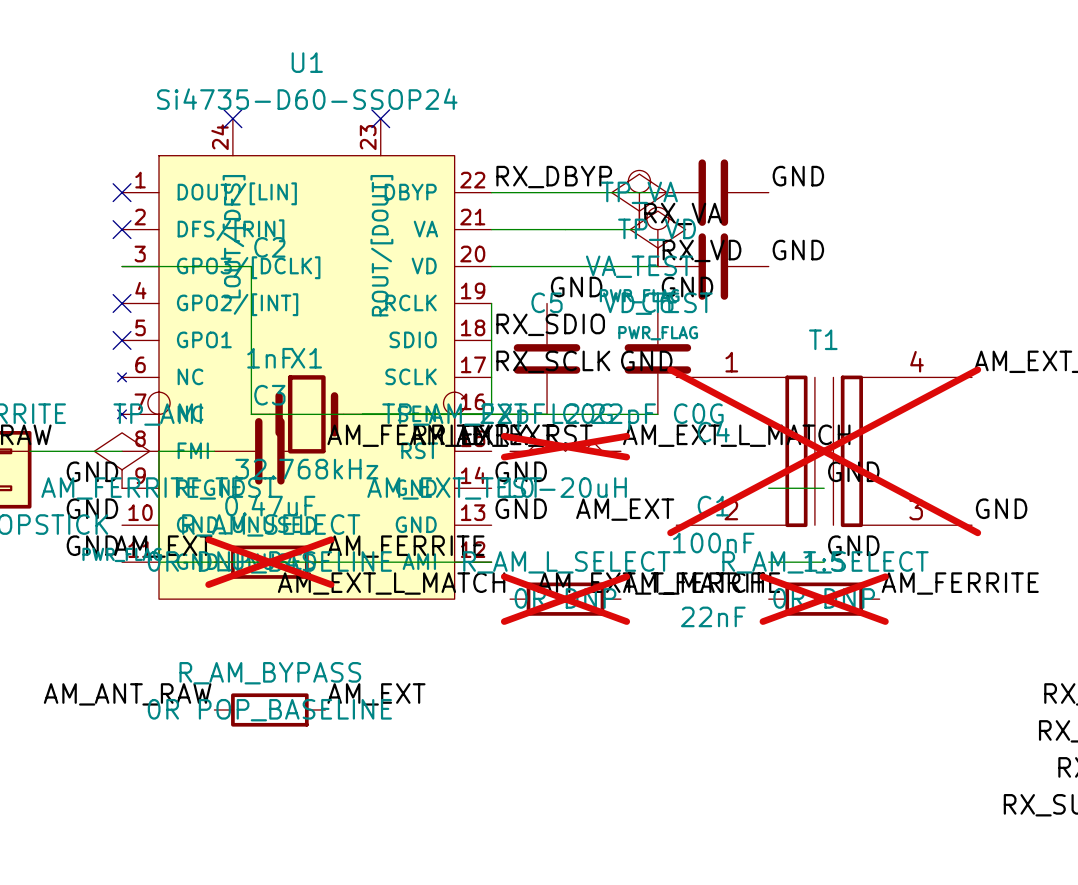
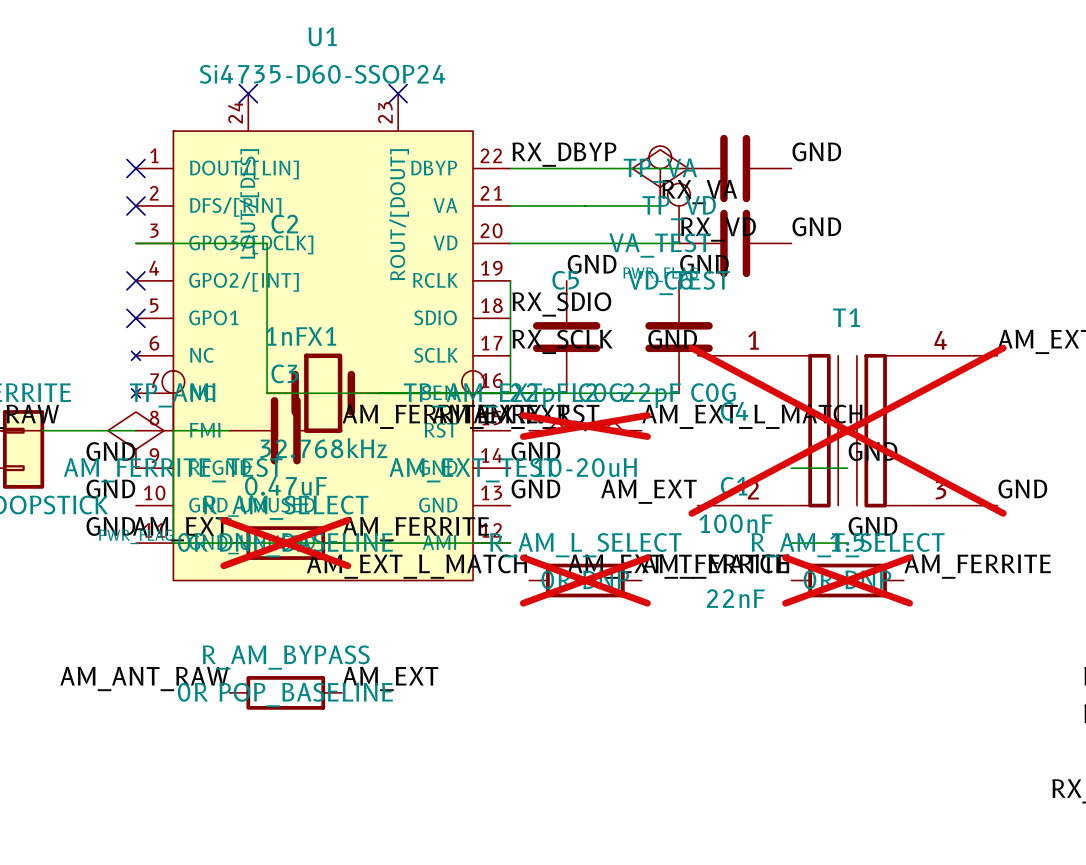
power symbol: PWR_FLAG (657, 238) -> none

